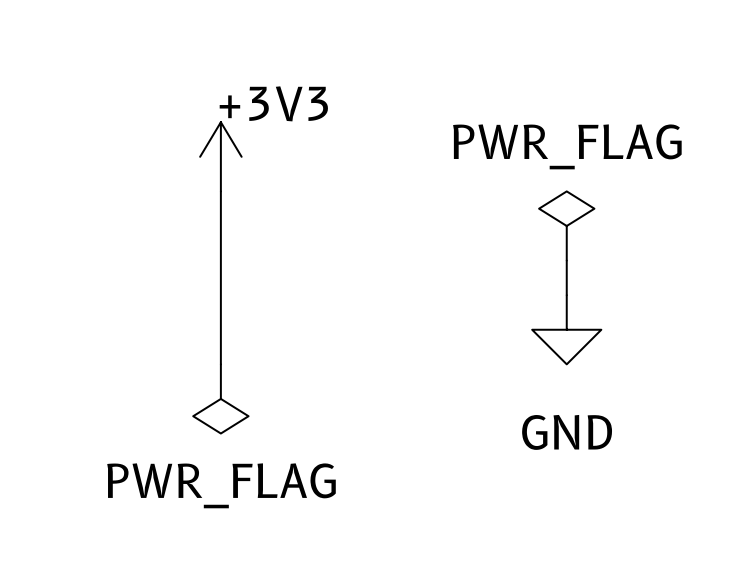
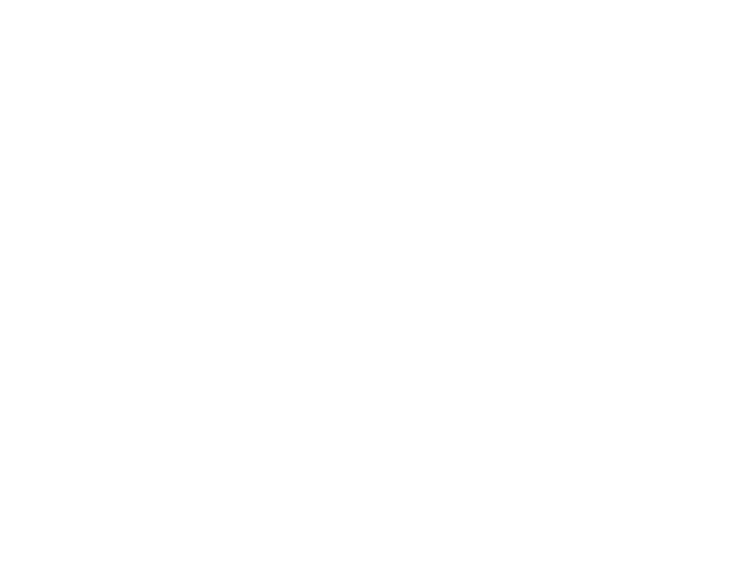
power symbol: +3V3 (220, 156) -> none
wire: (220, 191) (220, 364) -> none
power symbol: PWR_FLAG (566, 225) -> none
wire: (566, 260) (566, 295) -> none
power symbol: GND (566, 329) -> none
power symbol: PWR_FLAG (220, 398) -> none

